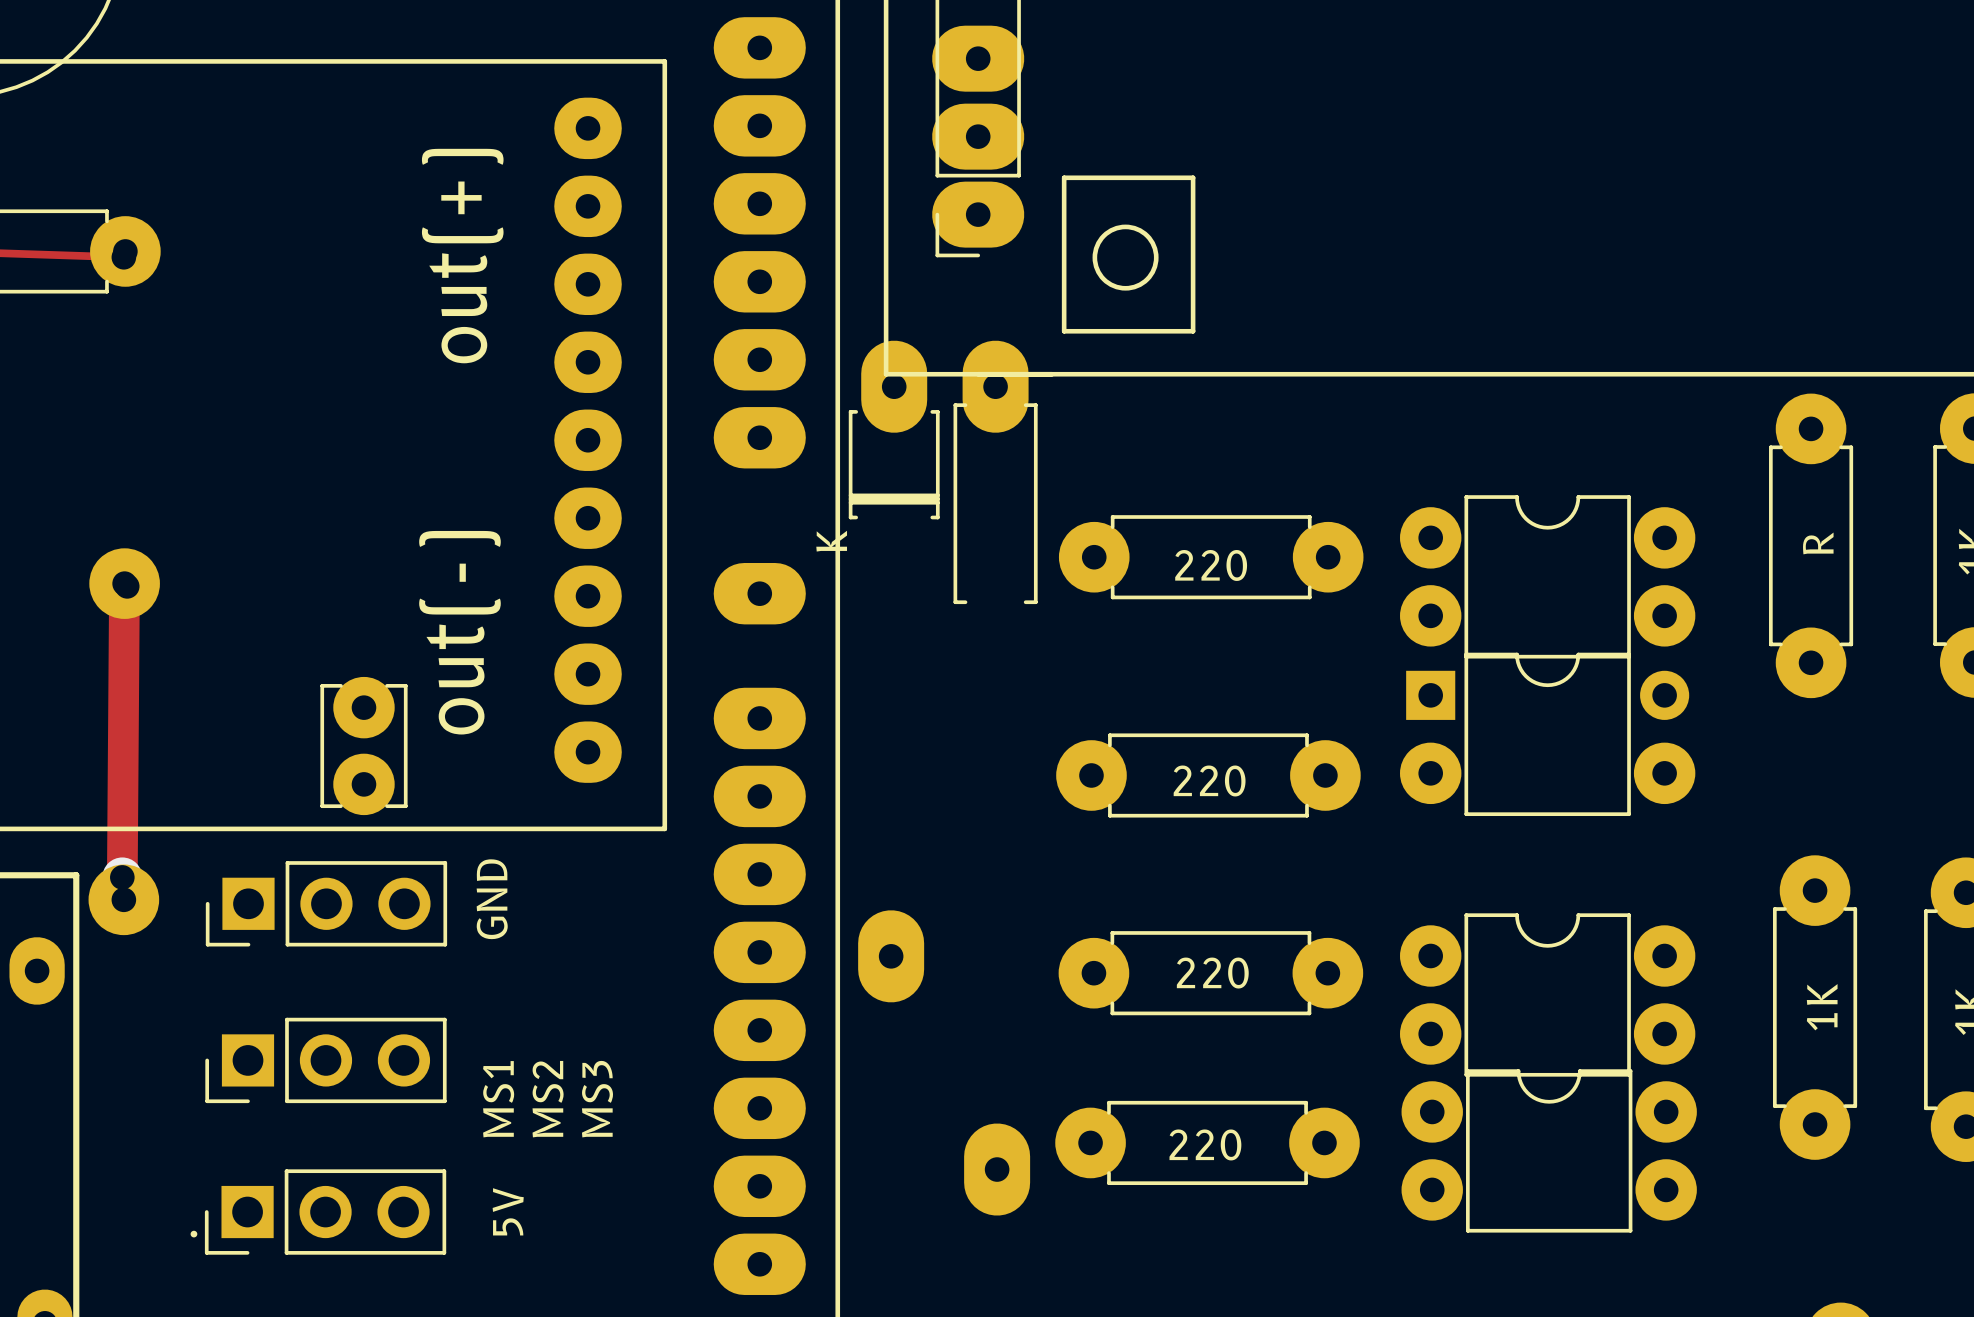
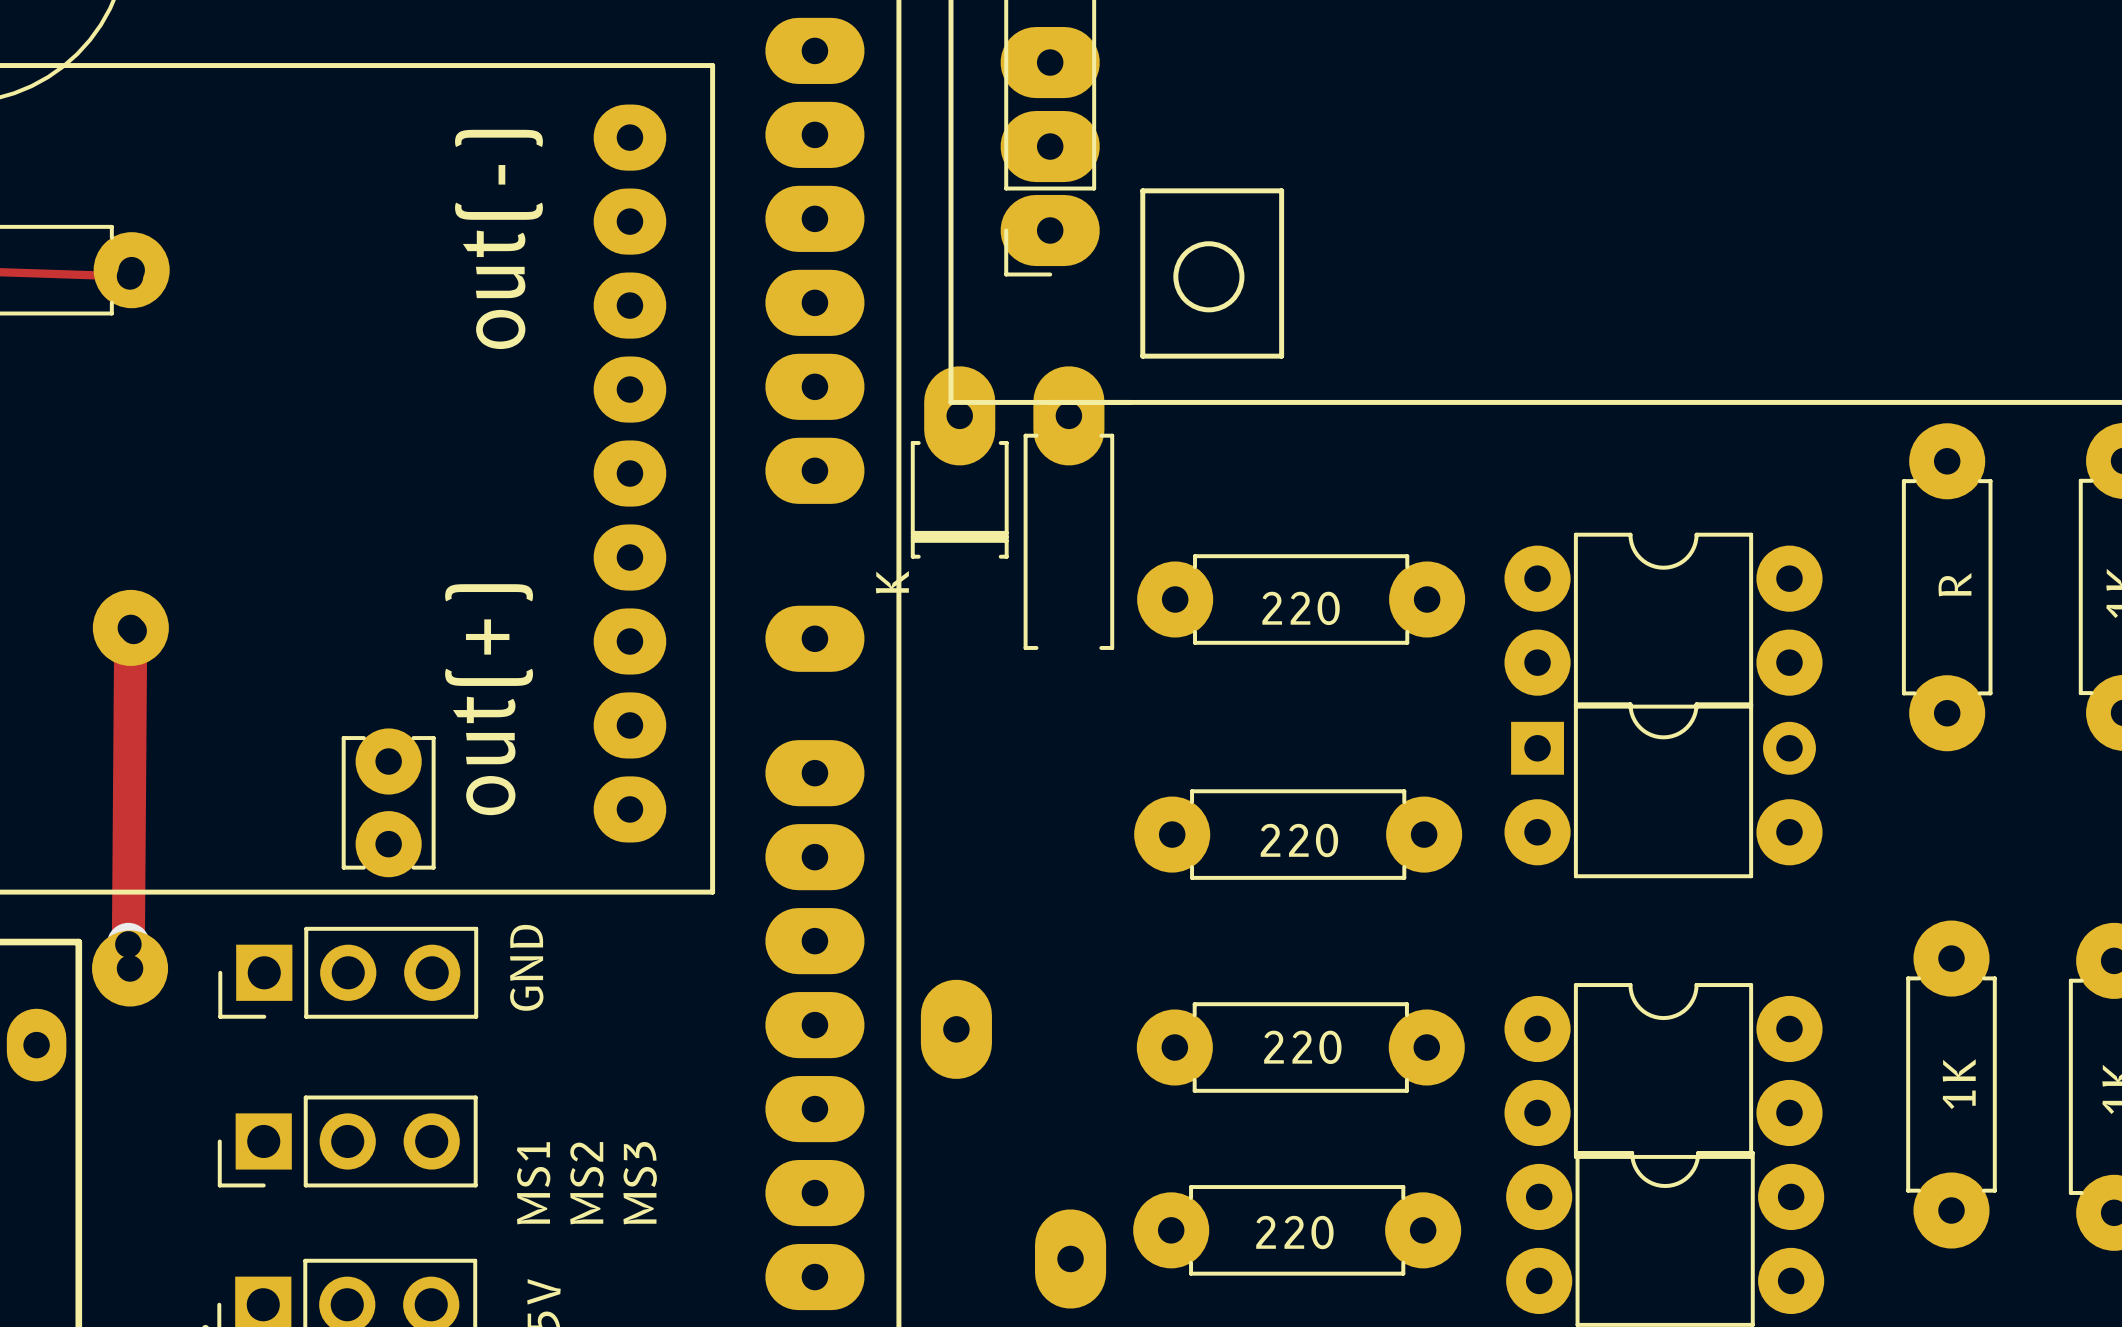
part text position: out(+) (462, 256) -> out(+) (489, 699)
part text position: out(-) (459, 632) -> out(-) (498, 239)

